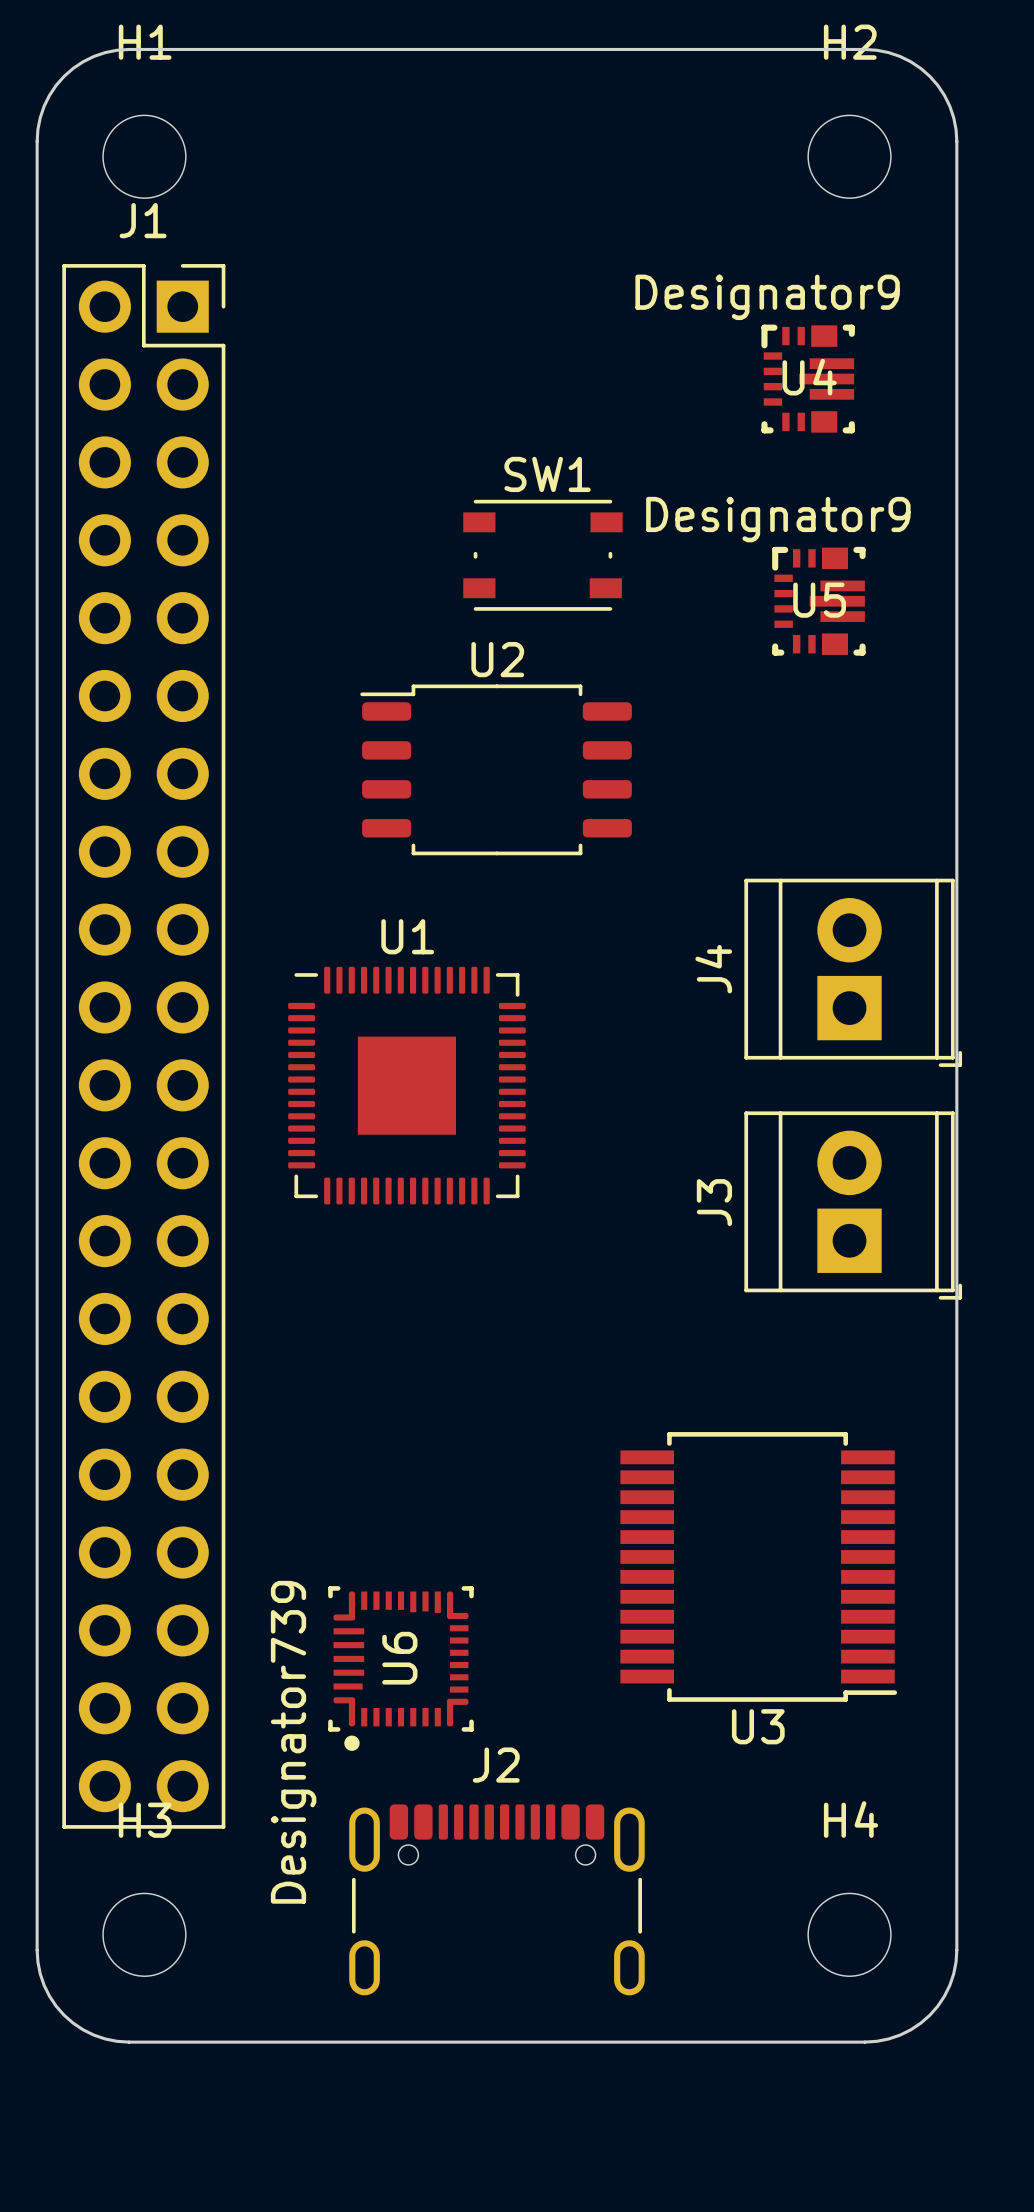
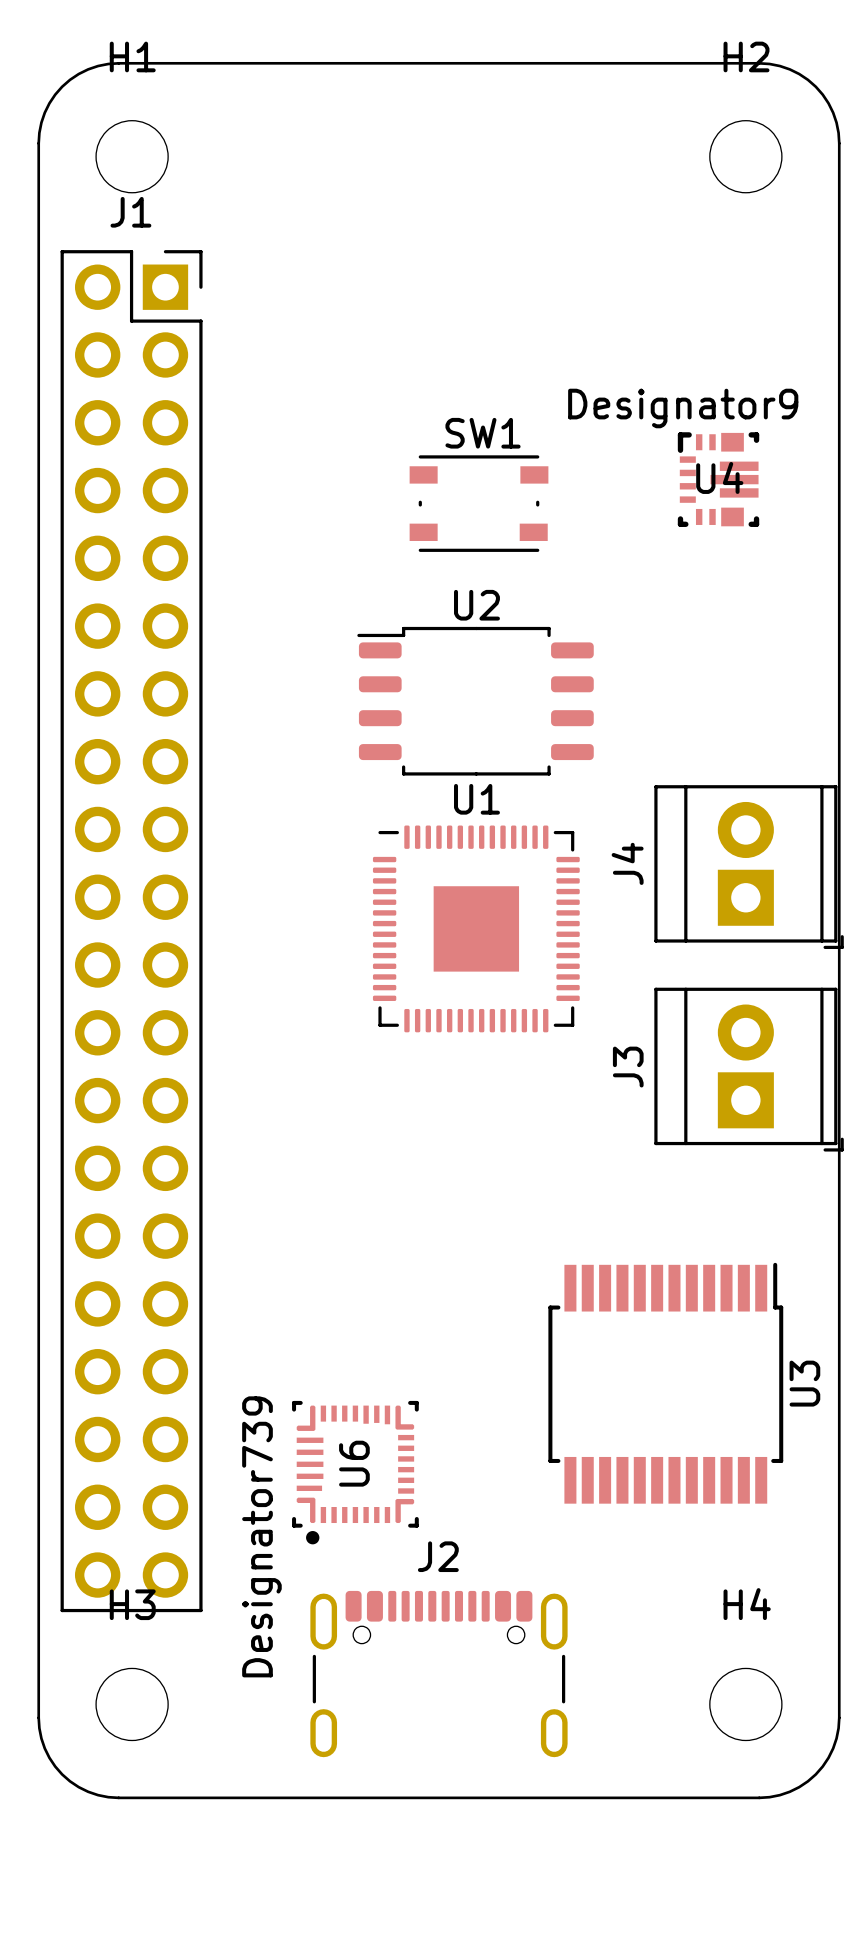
U4 position: (808, 379) -> (718, 479)
U5: (818, 601) -> none
U2 position: (496, 769) -> (475, 701)
U1 position: (406, 1085) -> (476, 928)
U3 rotation: 0° (758, 1566) -> 90° counterclockwise (665, 1383)

